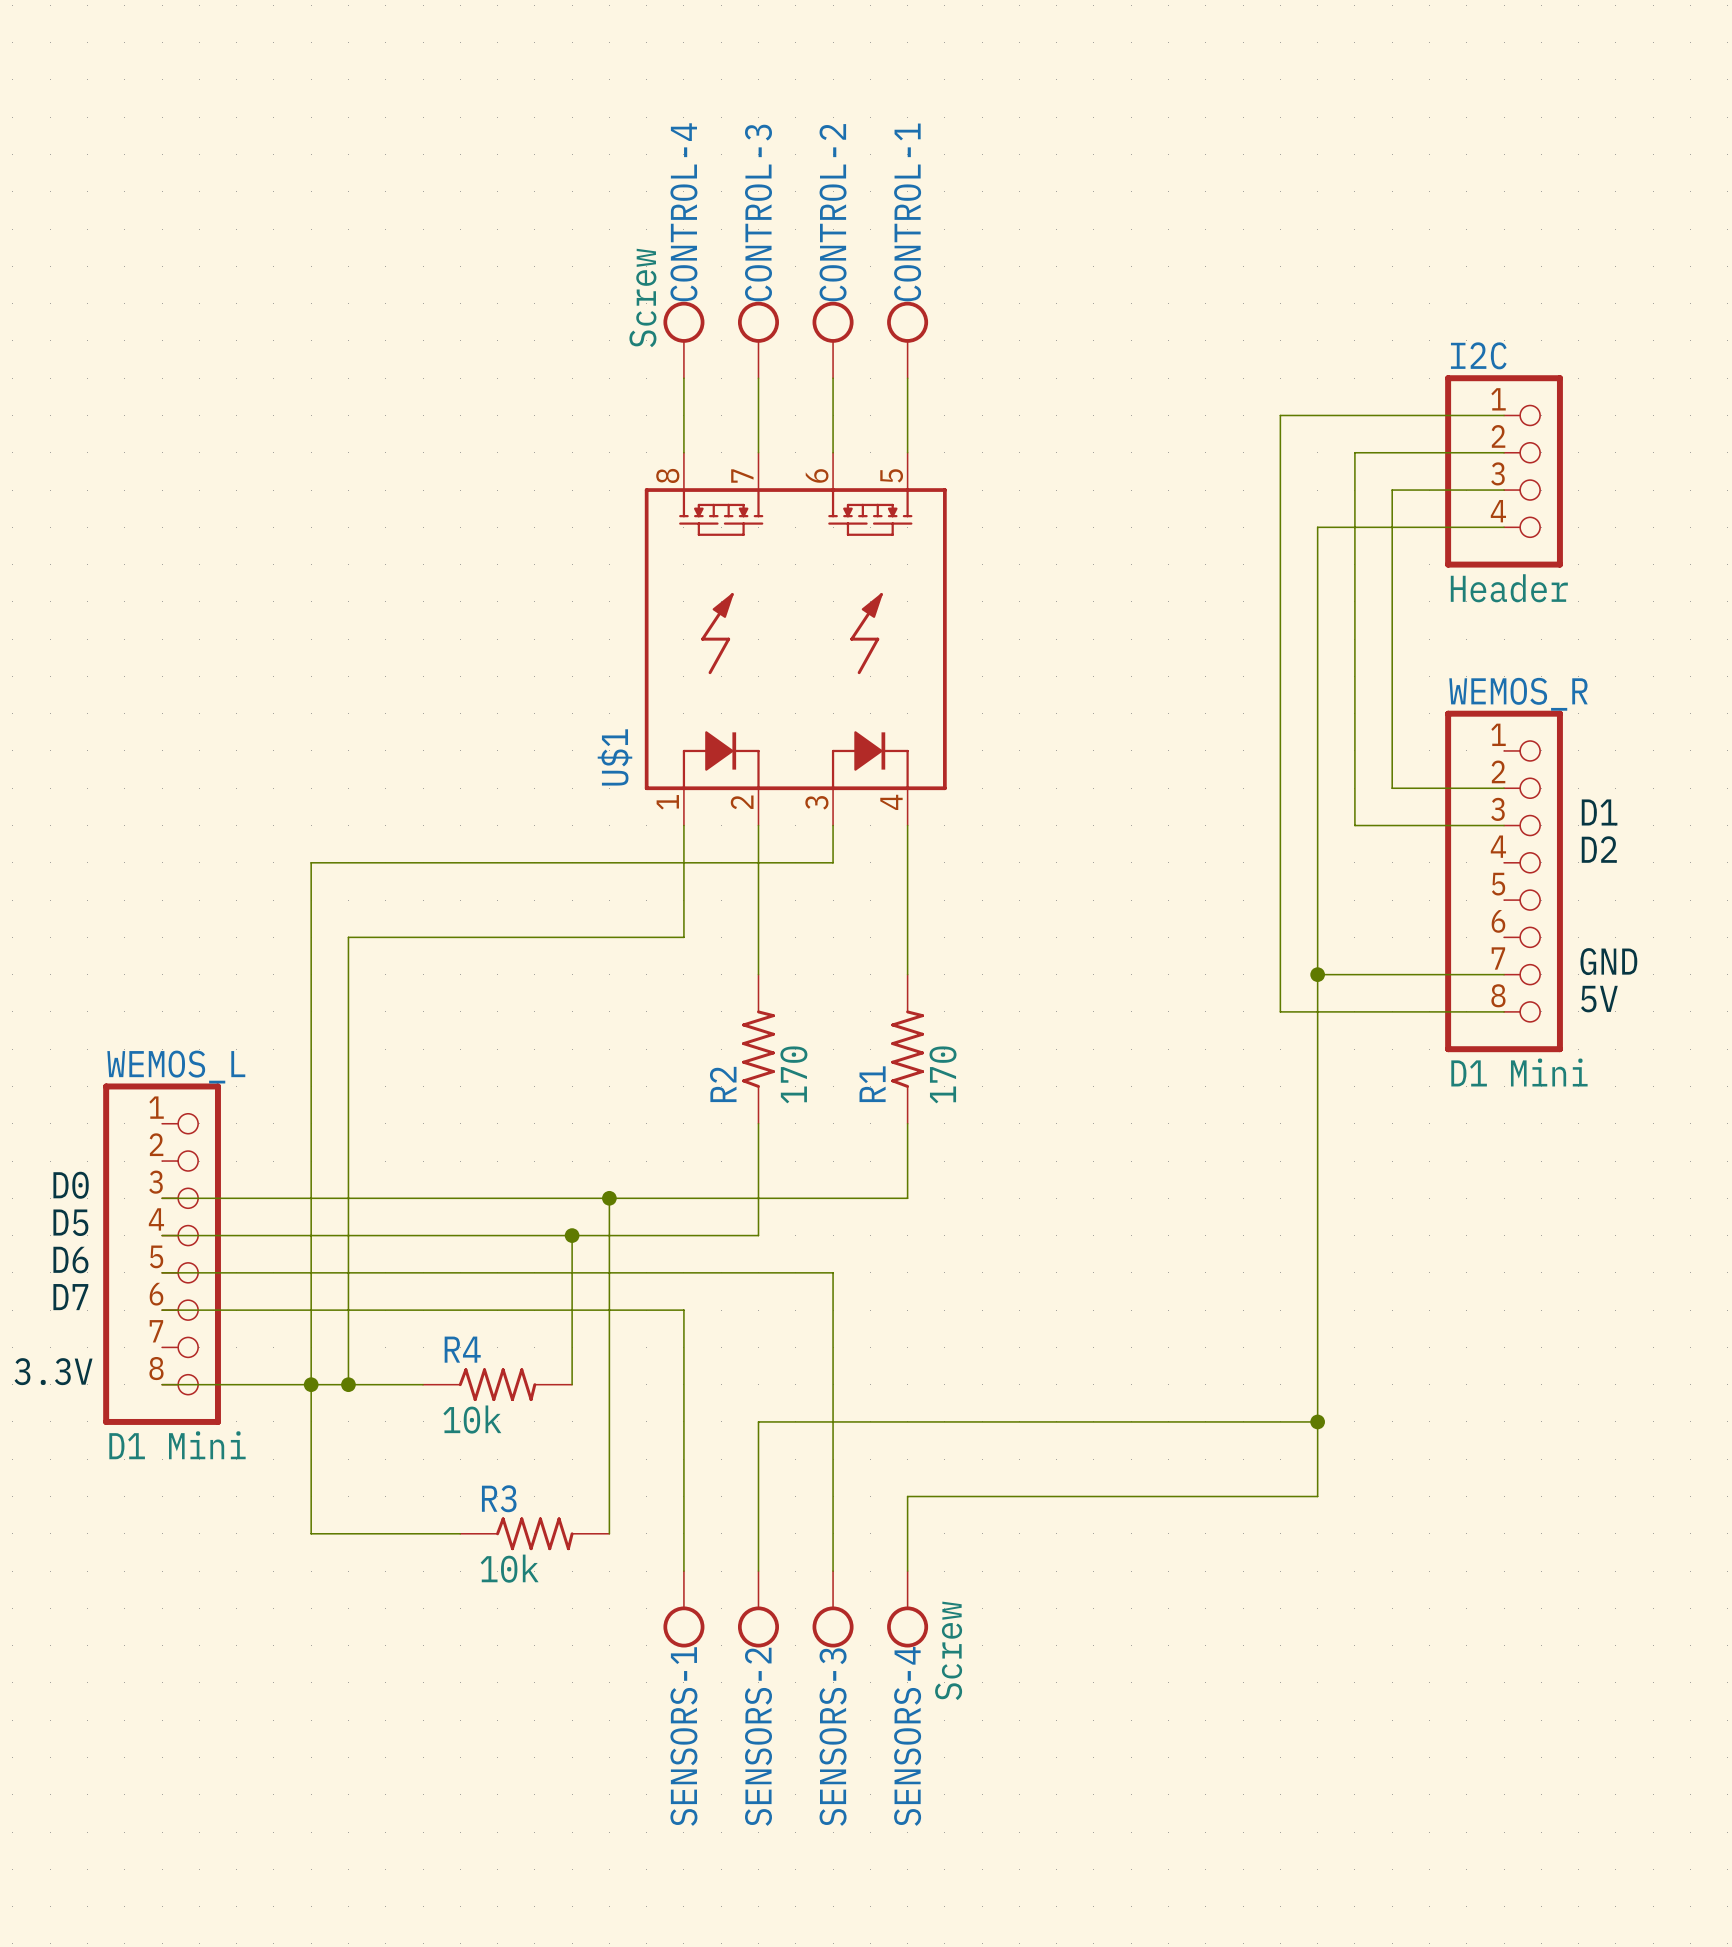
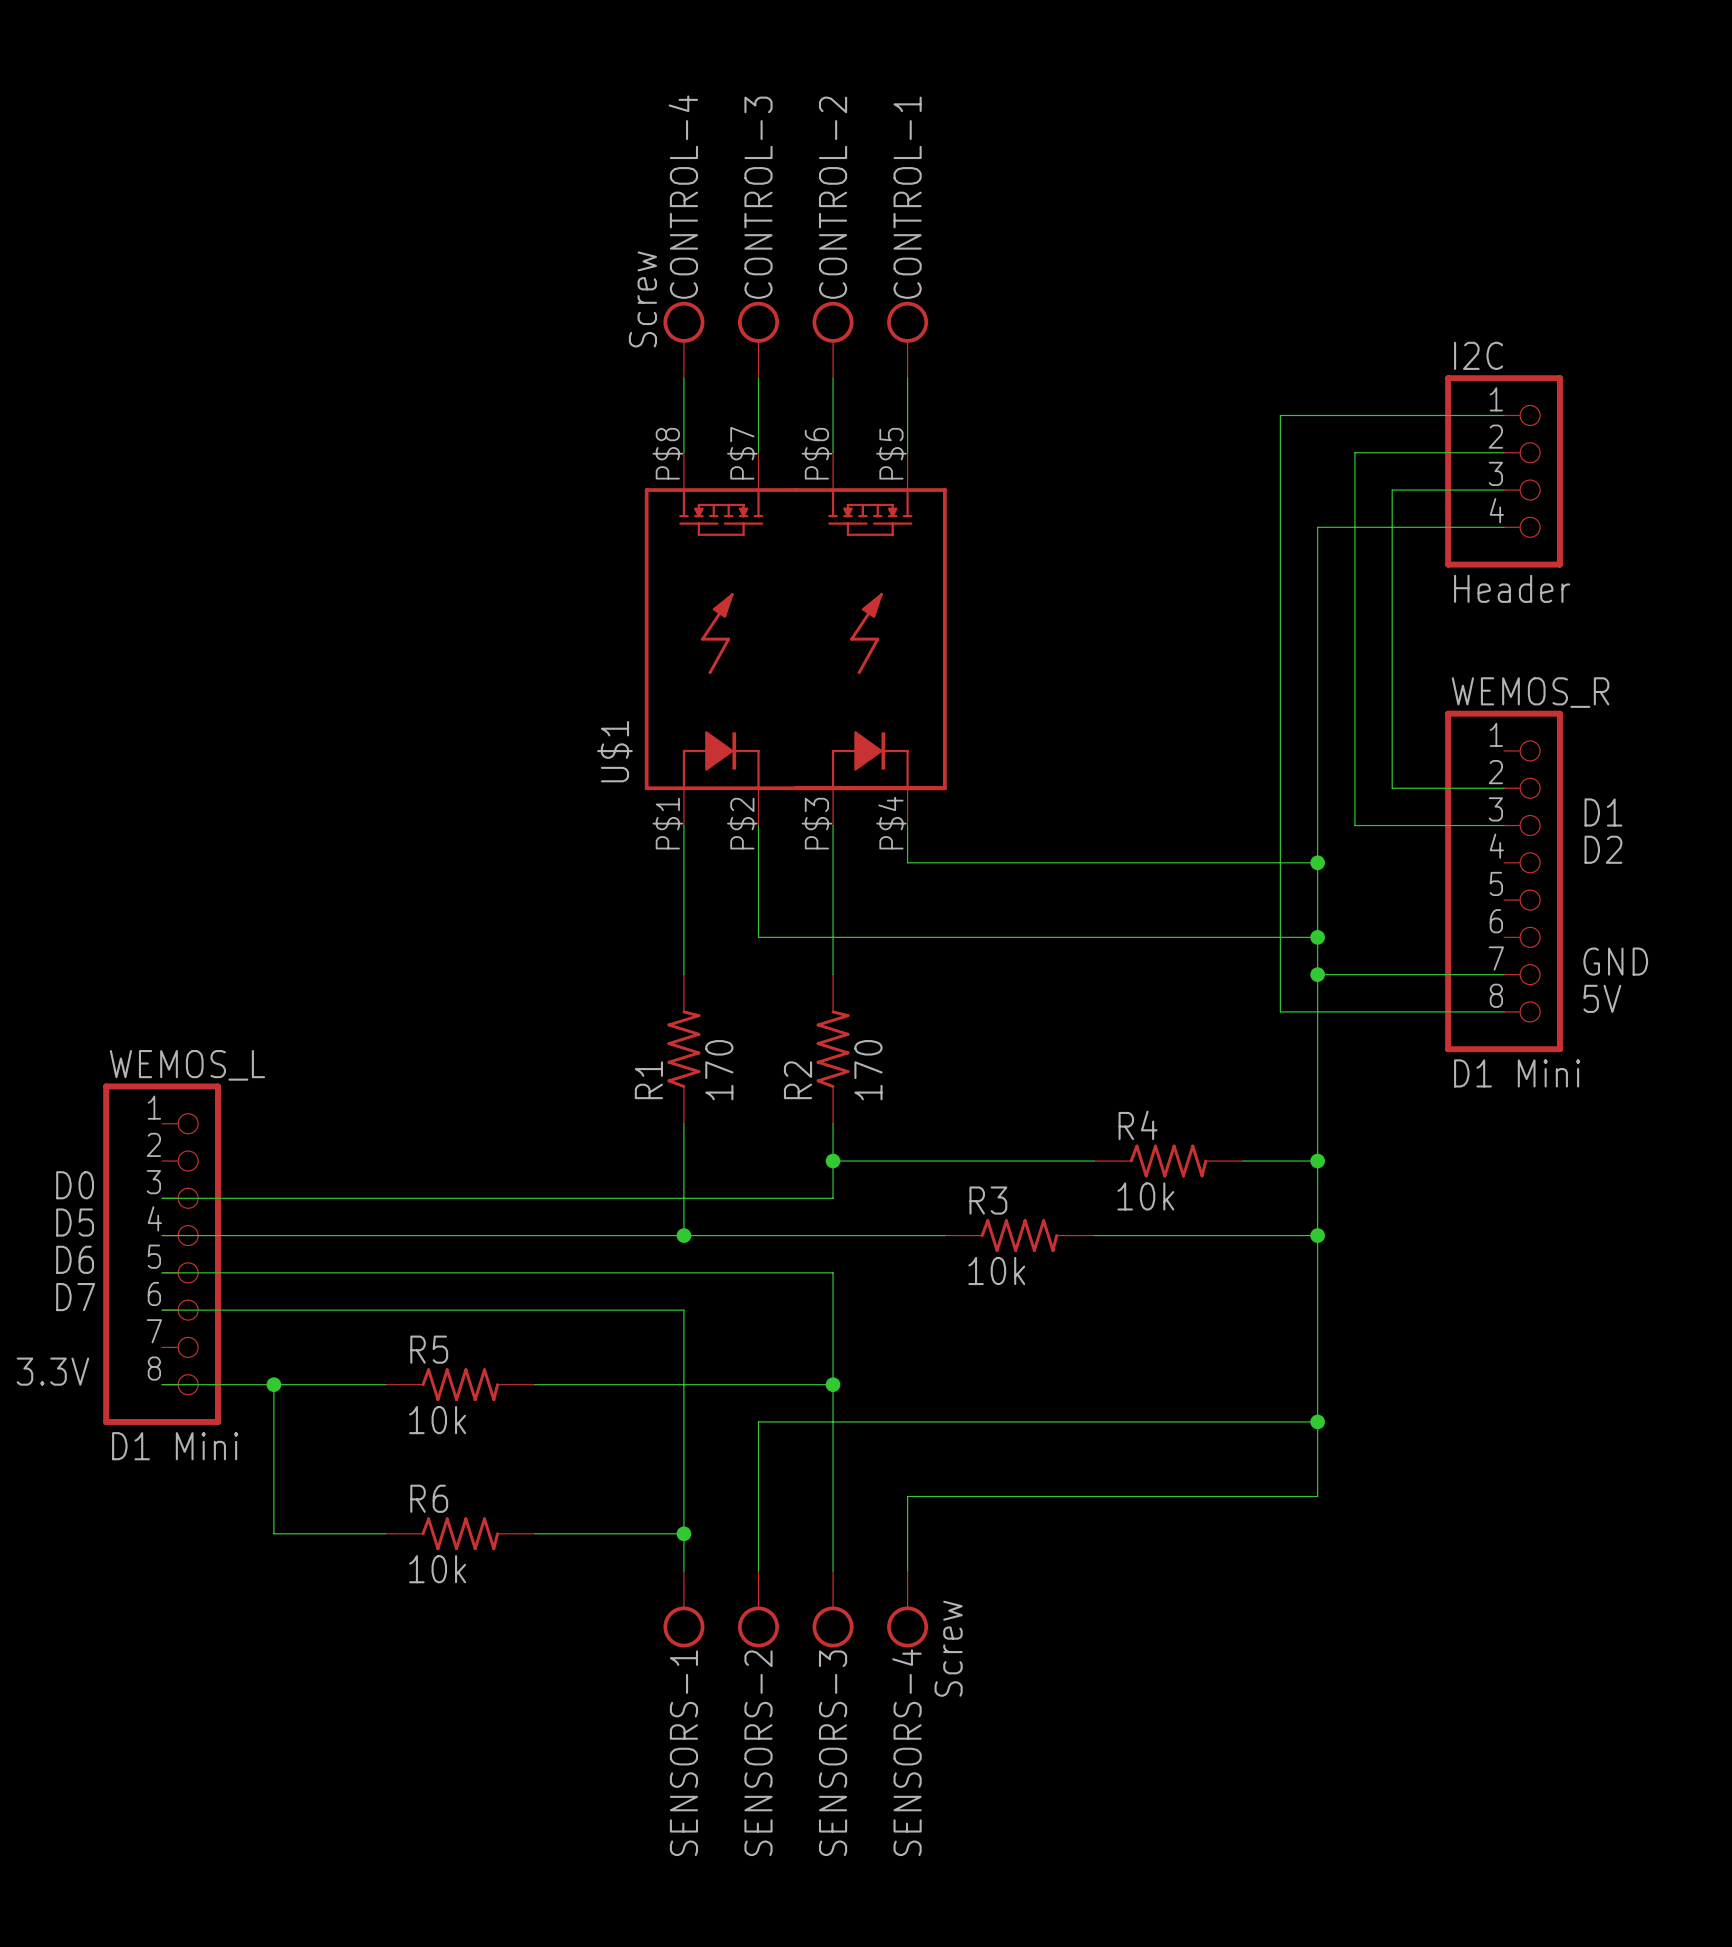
U$1 symbol: [644, 452, 947, 826] -> [644, 452, 947, 826]
wire: (833, 862) (311, 862) (311, 1533) -> (833, 862) (833, 974)
wire: (907, 862) (907, 974) -> (907, 862) (1317, 862)
junction: none -> (1317, 862)
wire: (683, 937) (348, 937) (348, 1384) -> (683, 937) (683, 974)
wire: (758, 937) (758, 974) -> (758, 937) (1317, 937)
junction: none -> (1317, 937)
R2 position: (758, 1049) -> (833, 1049)
R1 position: (907, 1049) -> (683, 1049)
wire: none -> (683, 1123) (683, 1235)
wire: (758, 1123) (758, 1235) -> (944, 1235) (758, 1235)
wire: (907, 1123) (907, 1198) (833, 1198) -> (833, 1123) (833, 1198)
wire: none -> (833, 1161) (1093, 1161)
junction: none -> (833, 1161)
wire: none -> (1243, 1161) (1317, 1161)
junction: none -> (1317, 1161)
wire: (609, 1198) (609, 1533) -> none
junction: (609, 1198) -> none
wire: (572, 1235) (572, 1384) -> none
junction: (572, 1235) -> none
junction: none -> (683, 1235)
wire: none -> (1093, 1235) (1317, 1235)
junction: none -> (1317, 1235)
wire: none -> (273, 1384) (273, 1533) (311, 1533)
junction: none -> (273, 1384)
junction: (311, 1384) -> none
junction: (348, 1384) -> none
R5: none -> 10k (460, 1384)
R4 position: (497, 1384) -> (1168, 1161)
wire: none -> (534, 1384) (833, 1384)
junction: none -> (833, 1384)
R6: none -> 10k (460, 1533)
wire: none -> (534, 1533) (683, 1533)
R3 position: (534, 1533) -> (1019, 1235)
junction: none -> (683, 1533)

